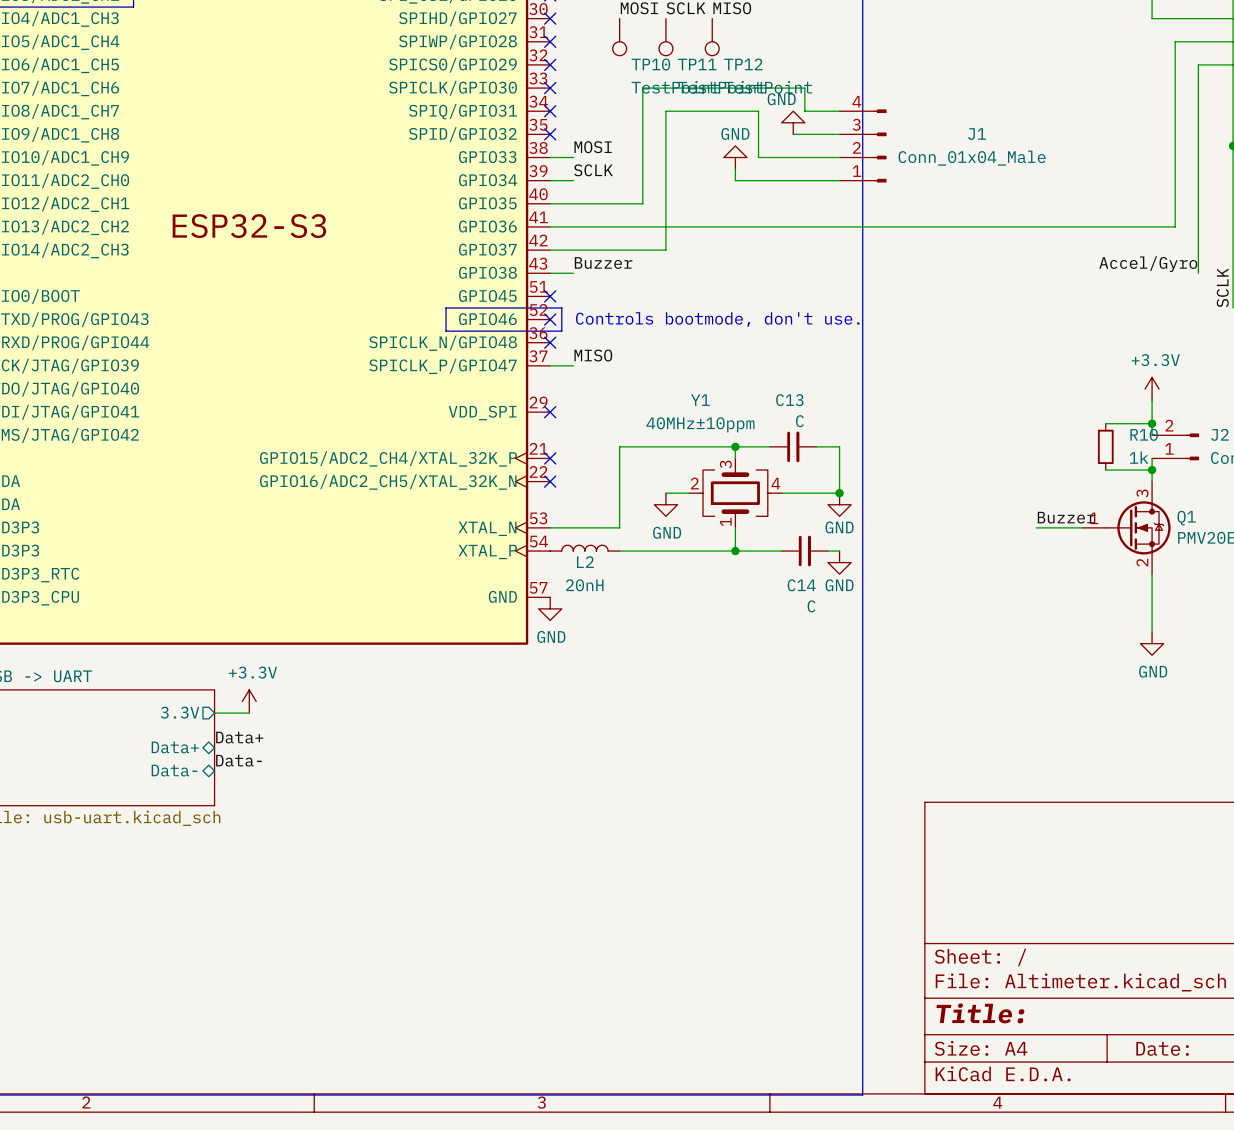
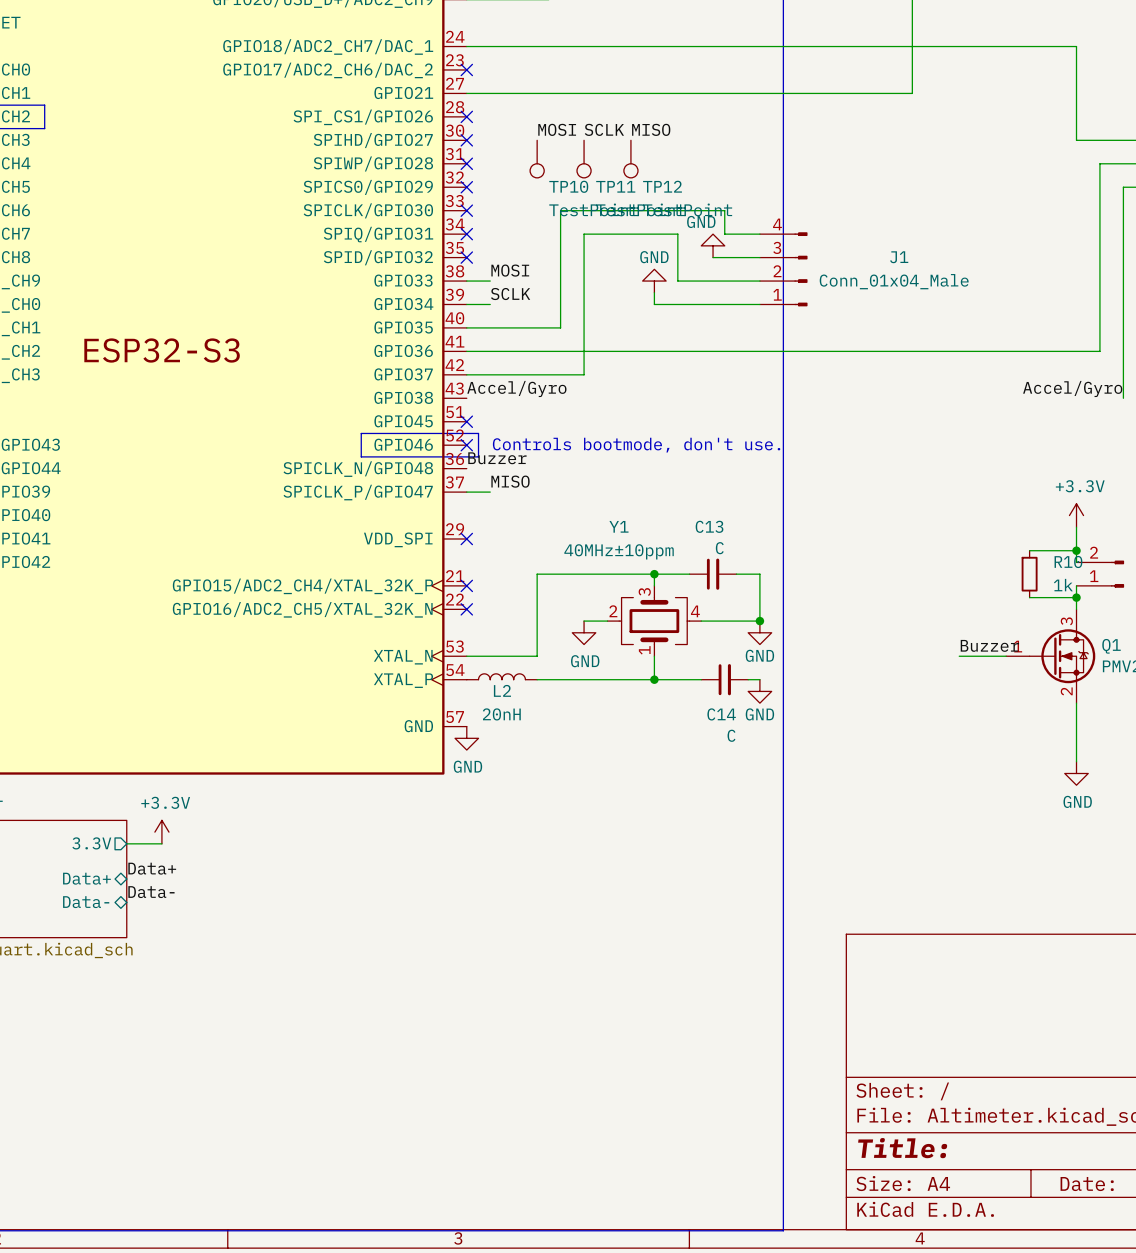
label position: Buzzer (603, 263) -> Buzzer (497, 458)
label: none -> Accel/Gyro (516, 388)
wire: (550, 273) (573, 273) -> none
no-connect mark: (550, 342) -> none

